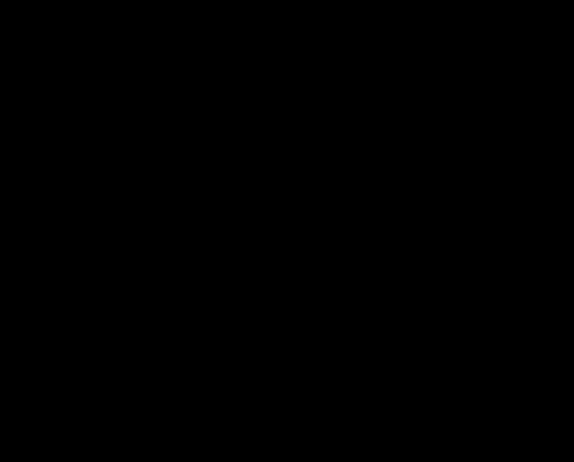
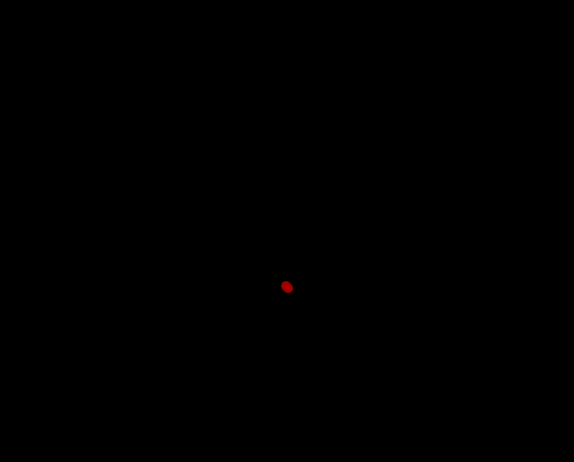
top track: none -> (285, 285) (288, 288)

